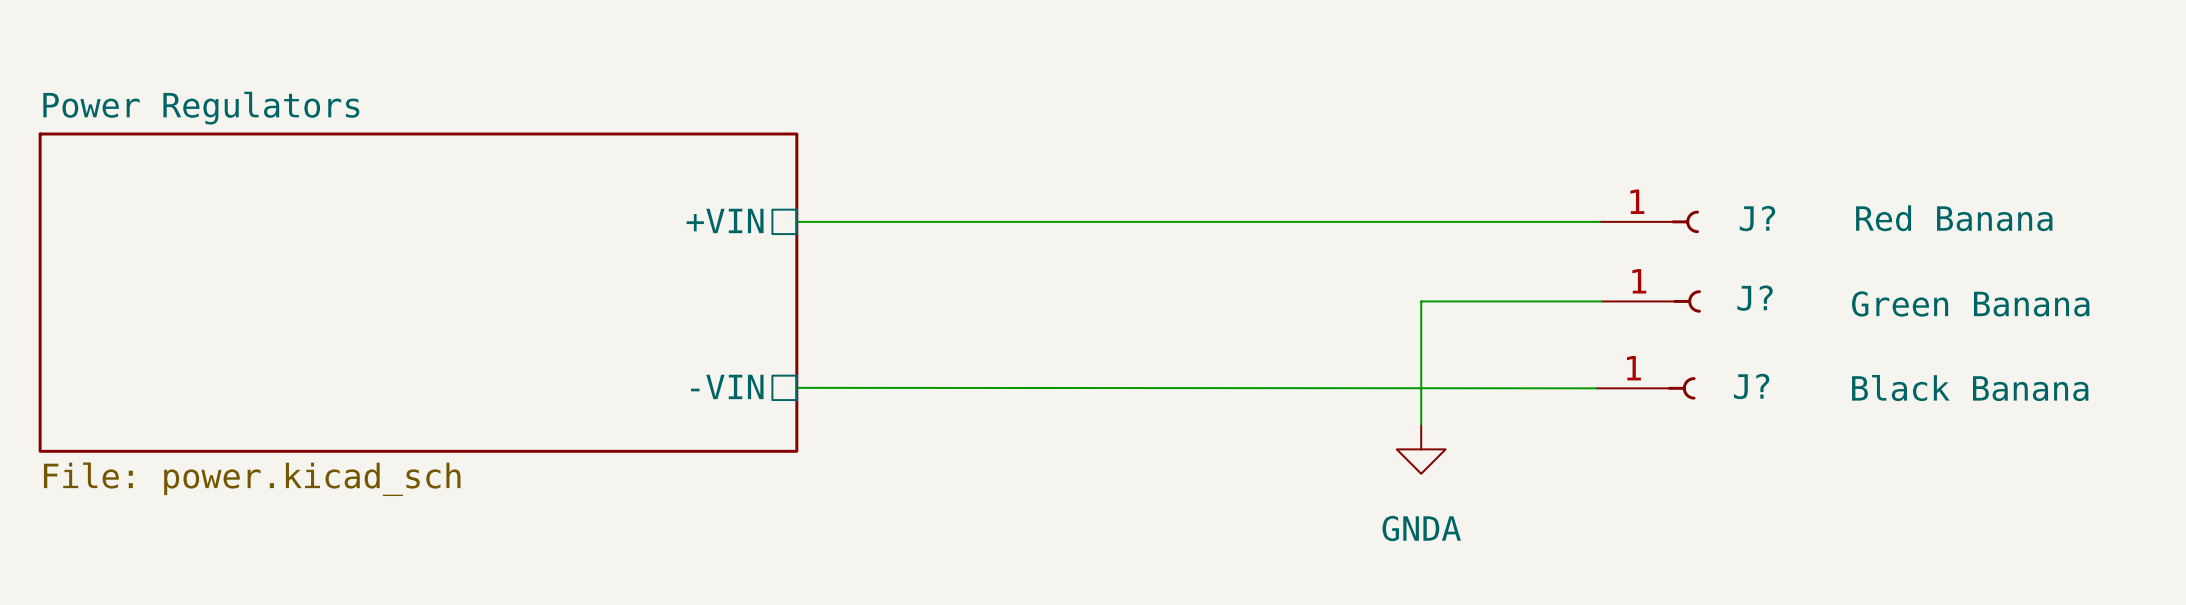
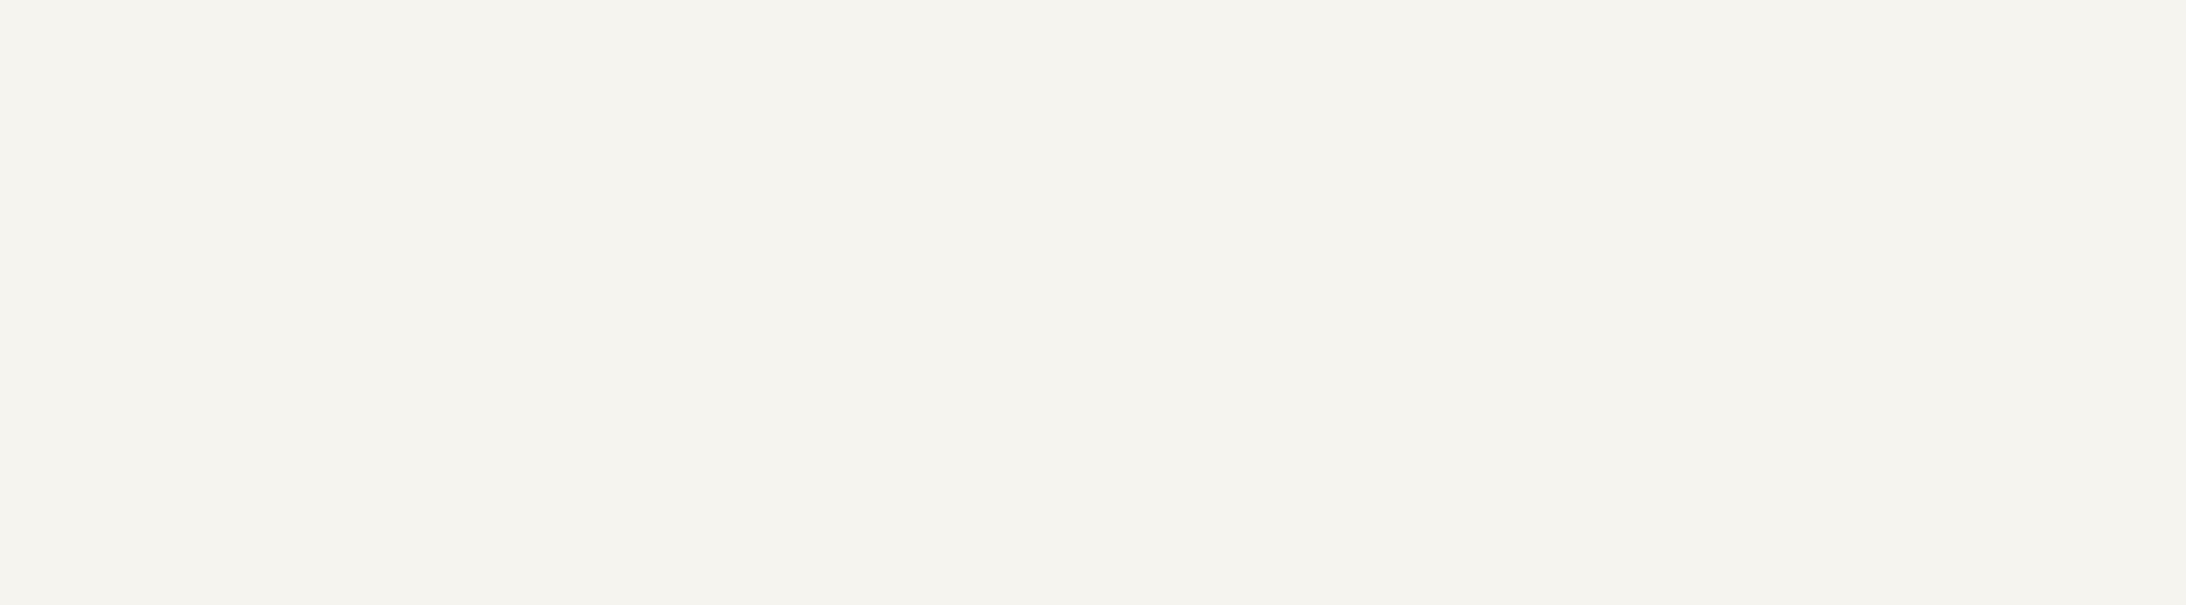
sheet pin: +VIN (725, 220) -> none
wire: (796, 221) (1599, 221) -> none
J?: Red Banana (1649, 221) -> none
sheet Power Regulators: File: power.kicad_sch (418, 292) -> none
wire: (1601, 301) (1421, 301) (1421, 424) -> none
J?: Green Banana (1651, 301) -> none
sheet pin: -VIN (727, 386) -> none
wire: (796, 387) (1596, 388) -> none
J?: Black Banana (1646, 388) -> none
power symbol: GNDA (1421, 449) -> none

